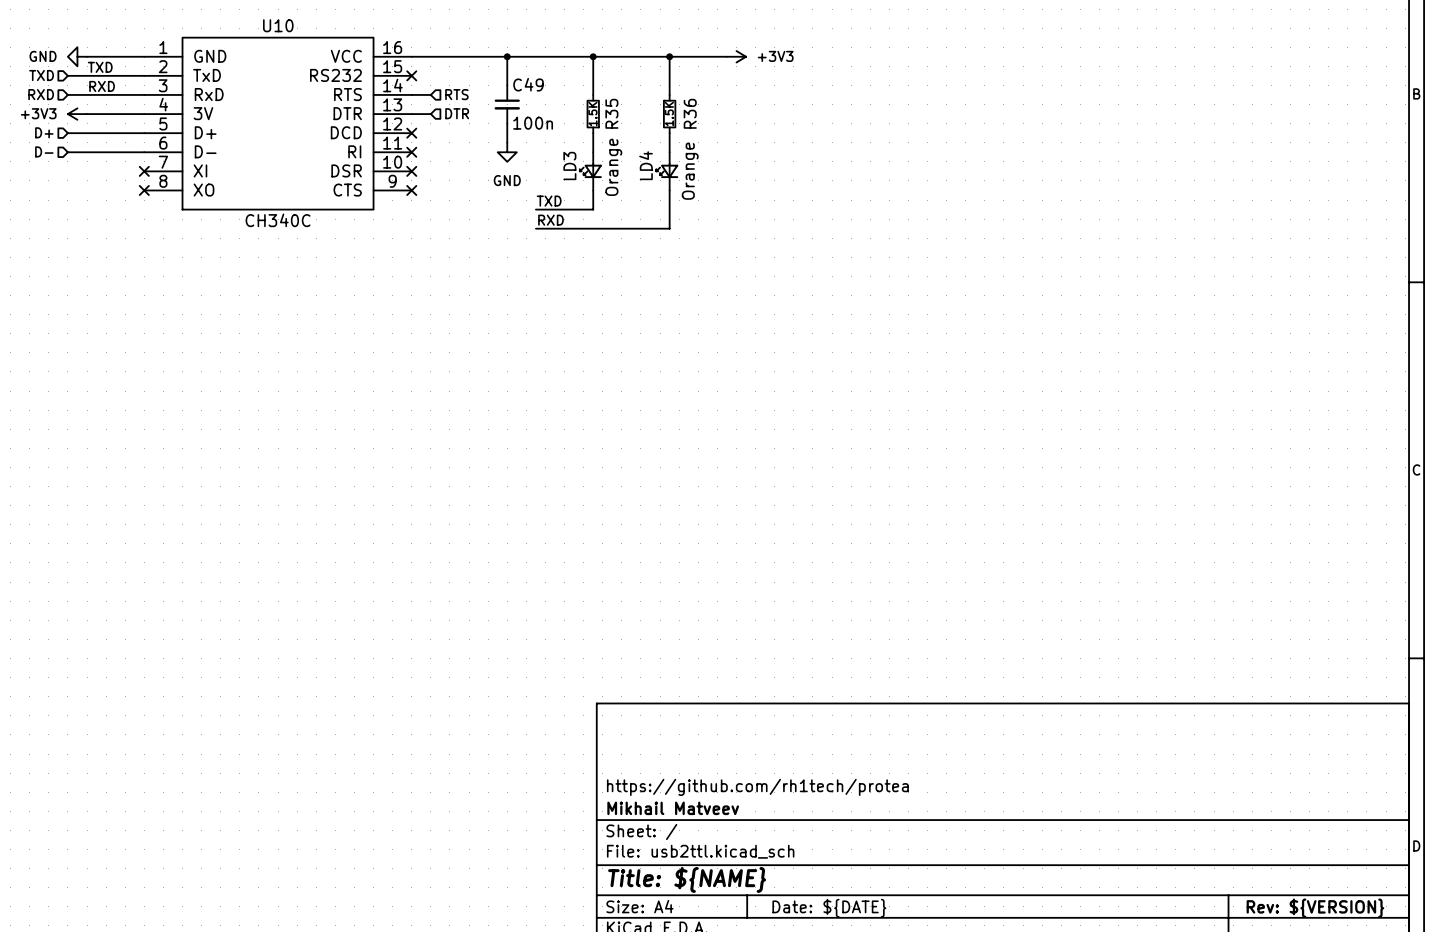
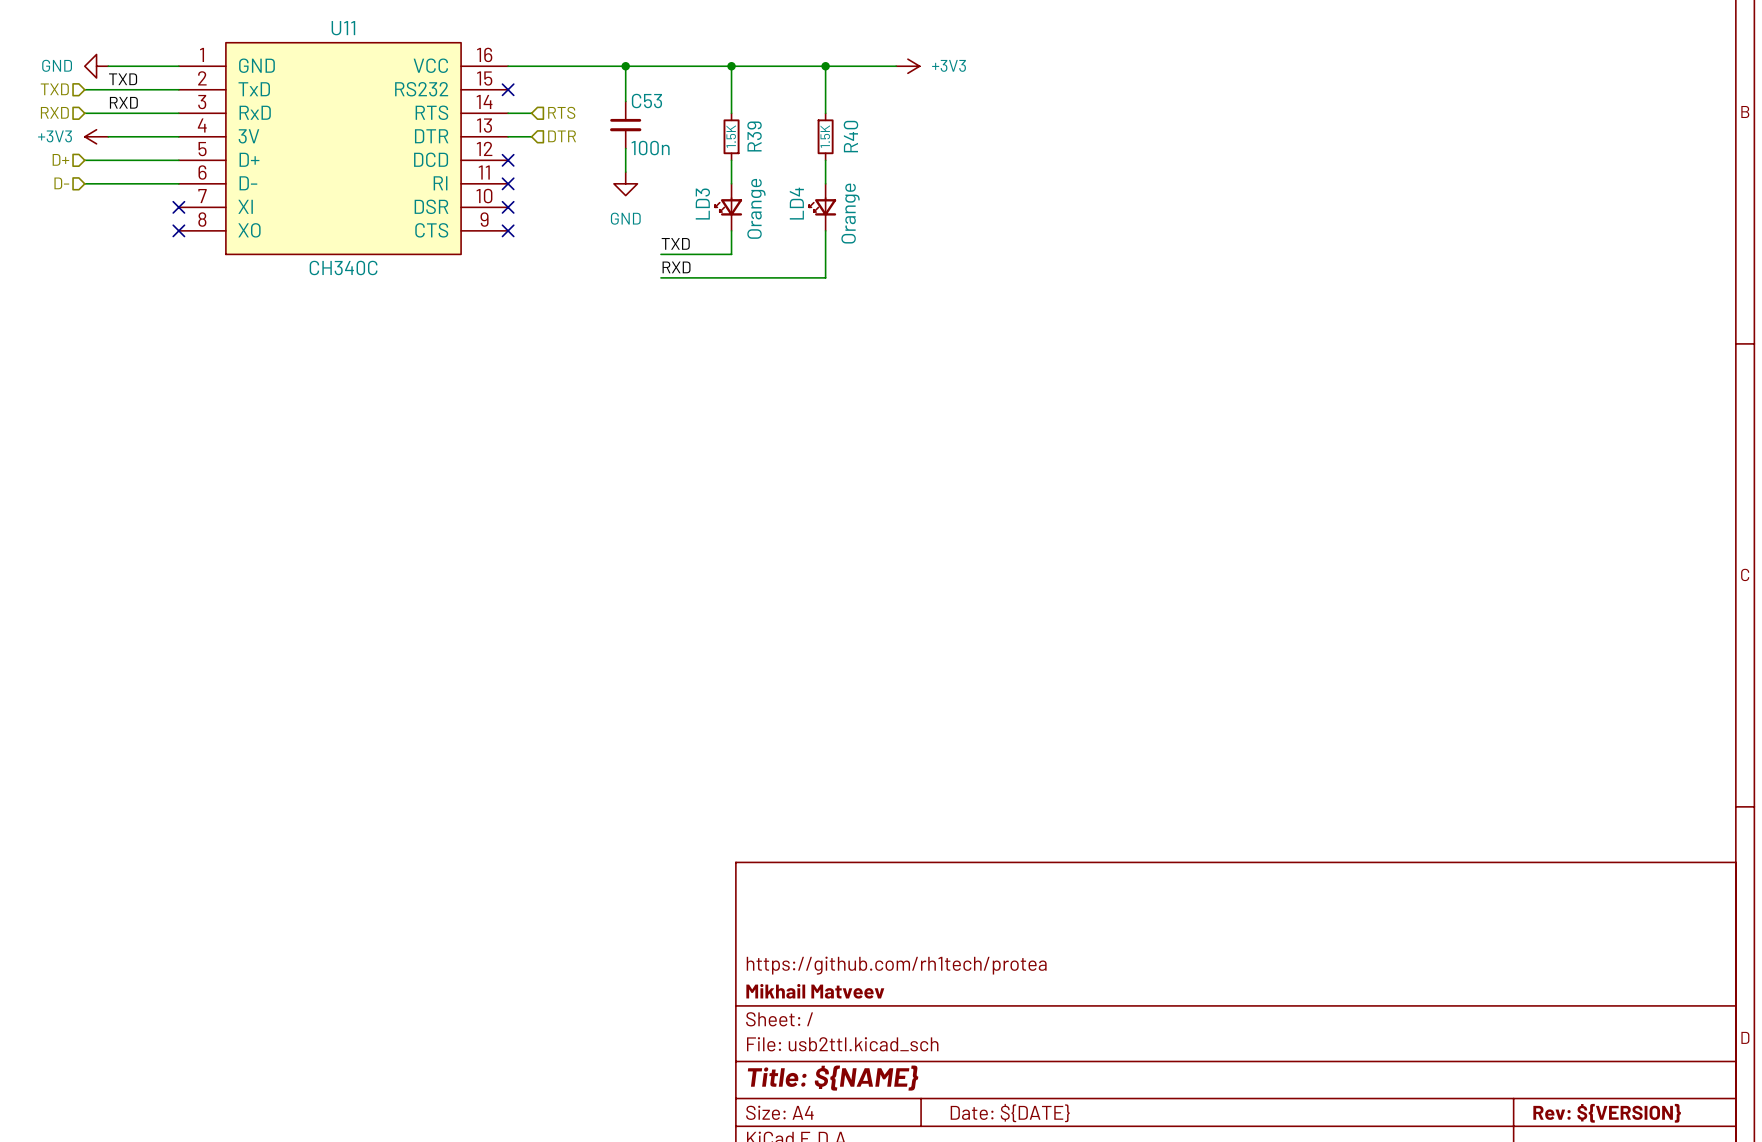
U10 name: U10 (278, 25) -> U11 (343, 28)
C49 name: C49 (528, 84) -> C53 (646, 101)
R35 name: R35 (611, 113) -> R39 (754, 136)
R36 name: R36 (690, 113) -> R40 (850, 136)

